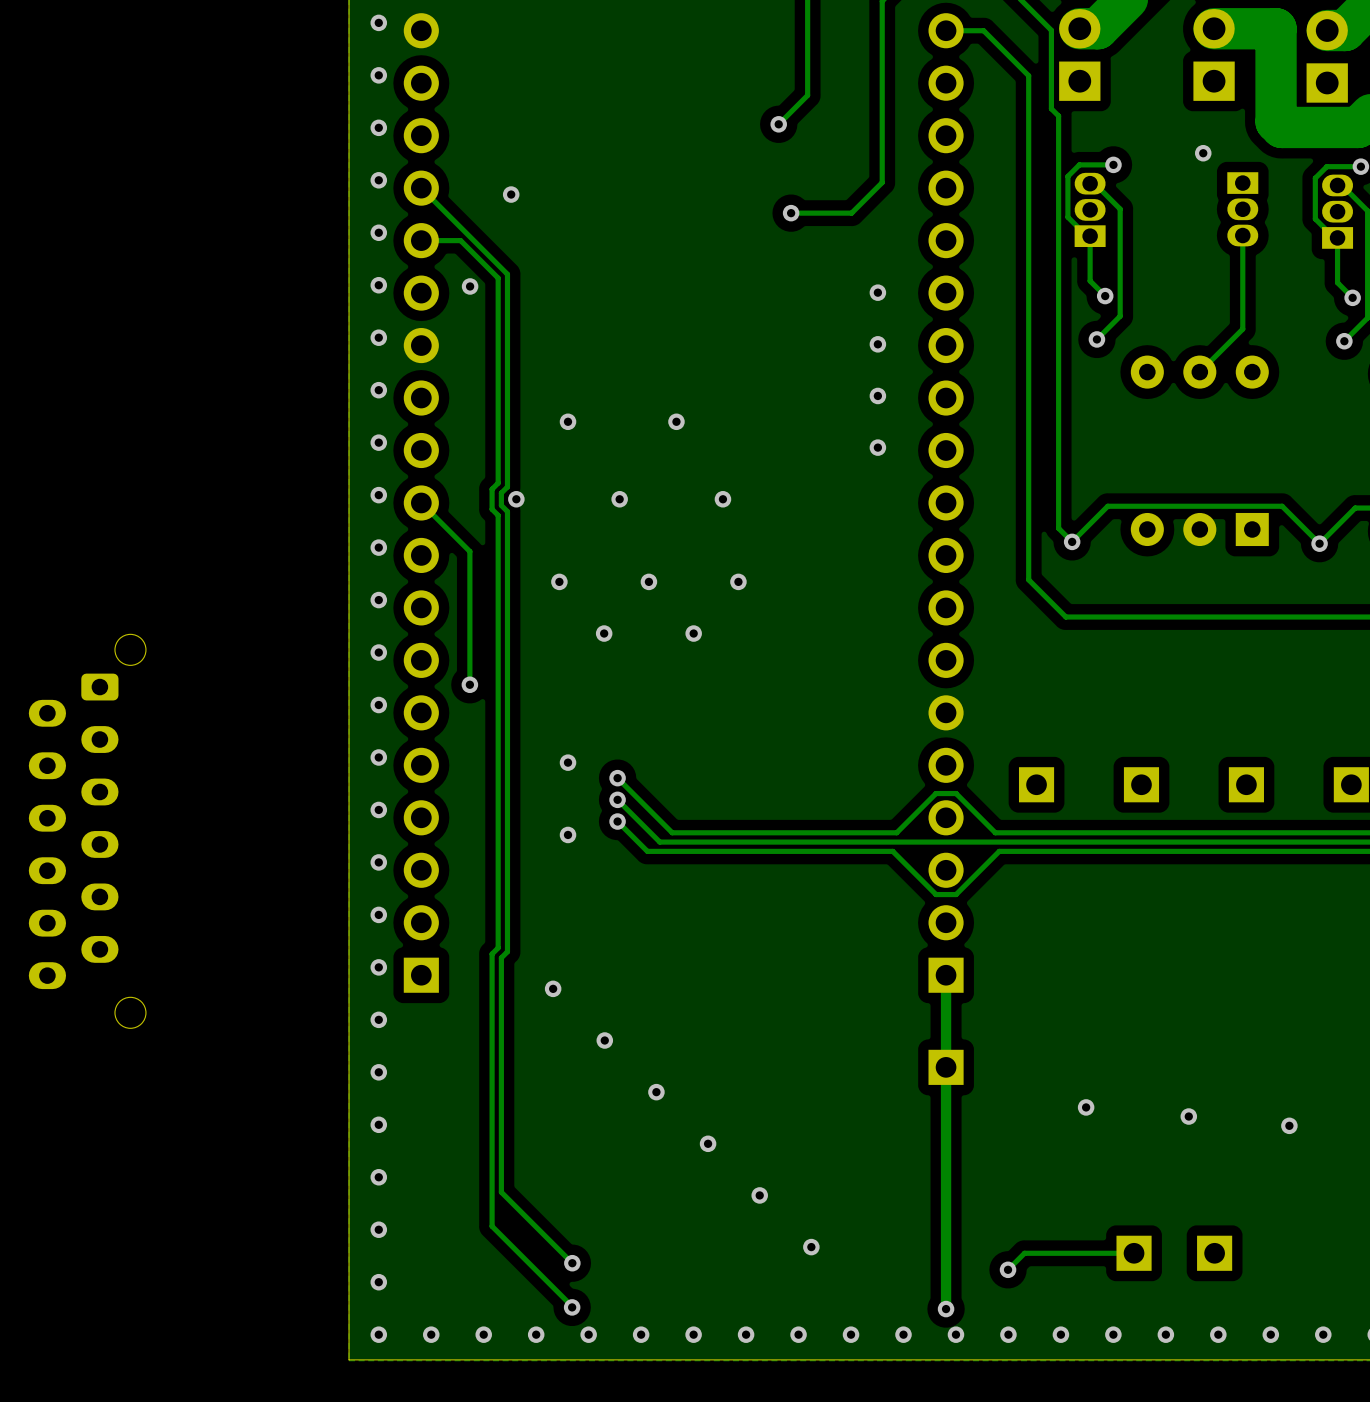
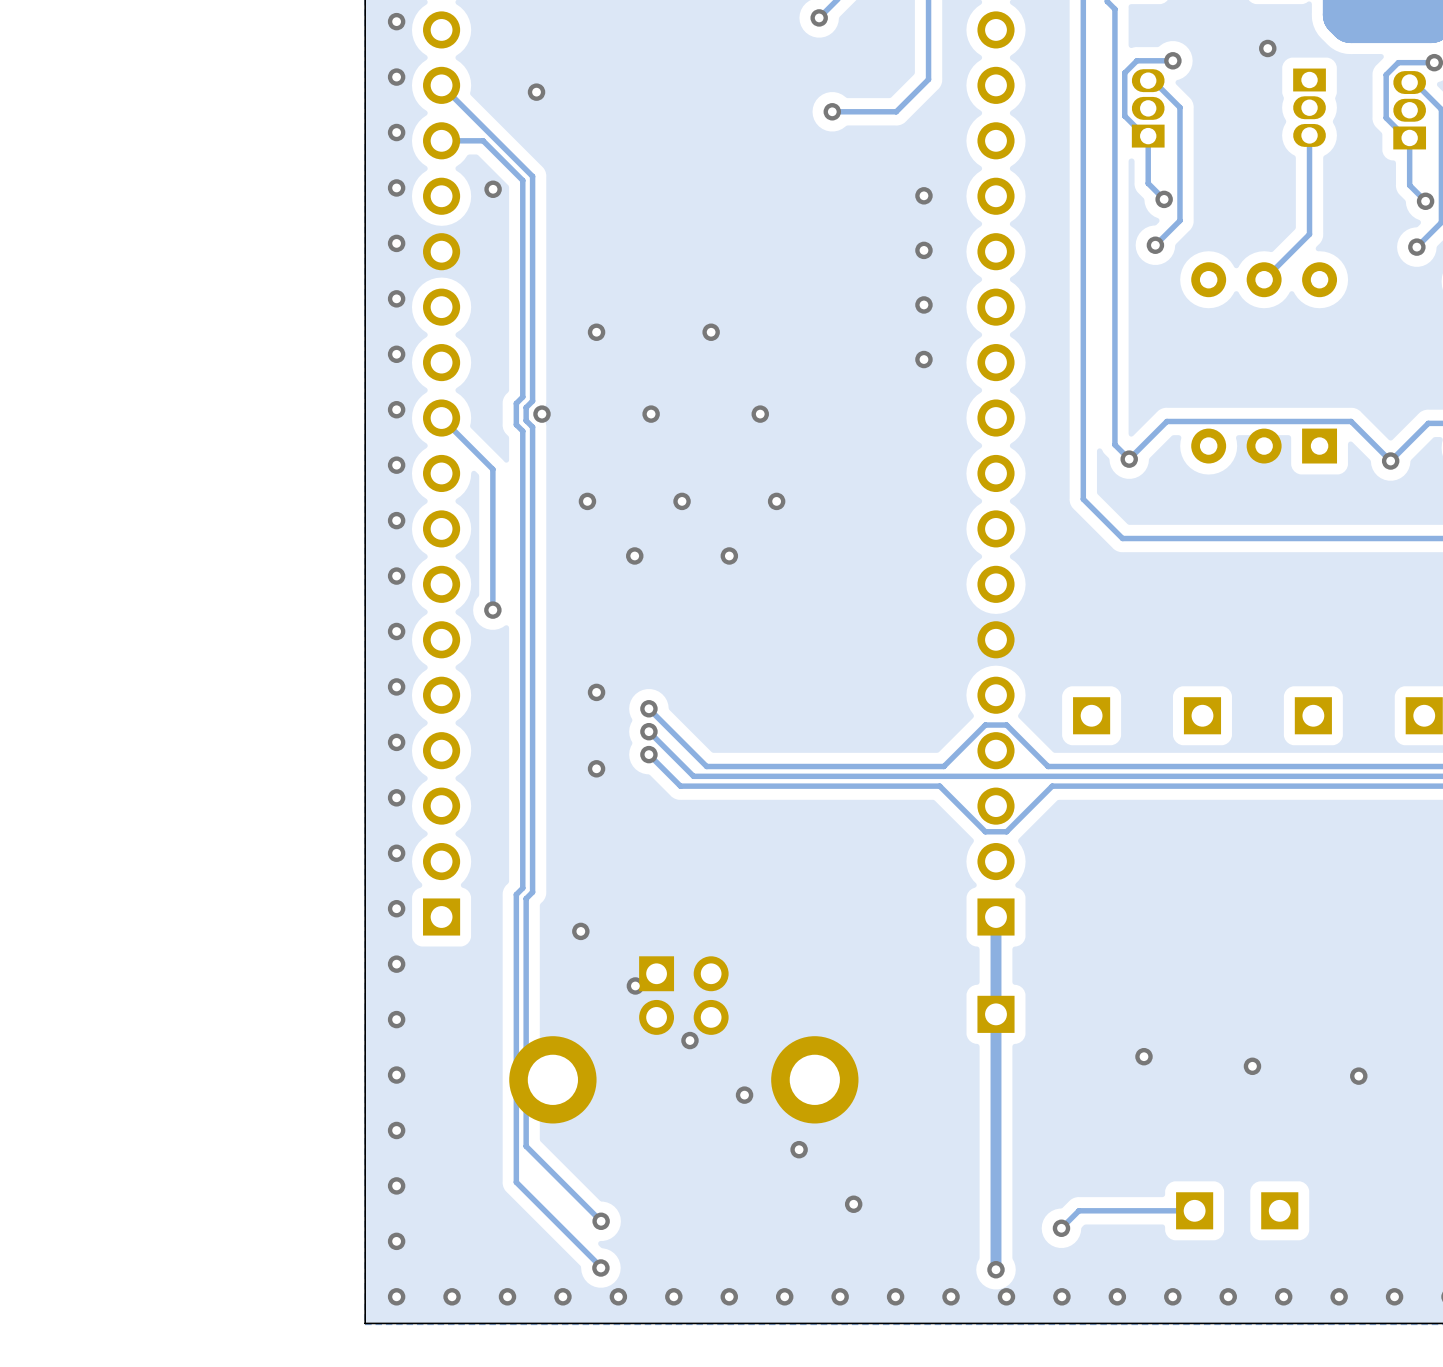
part: (87, 831) -> none
part: none -> (683, 1039)

